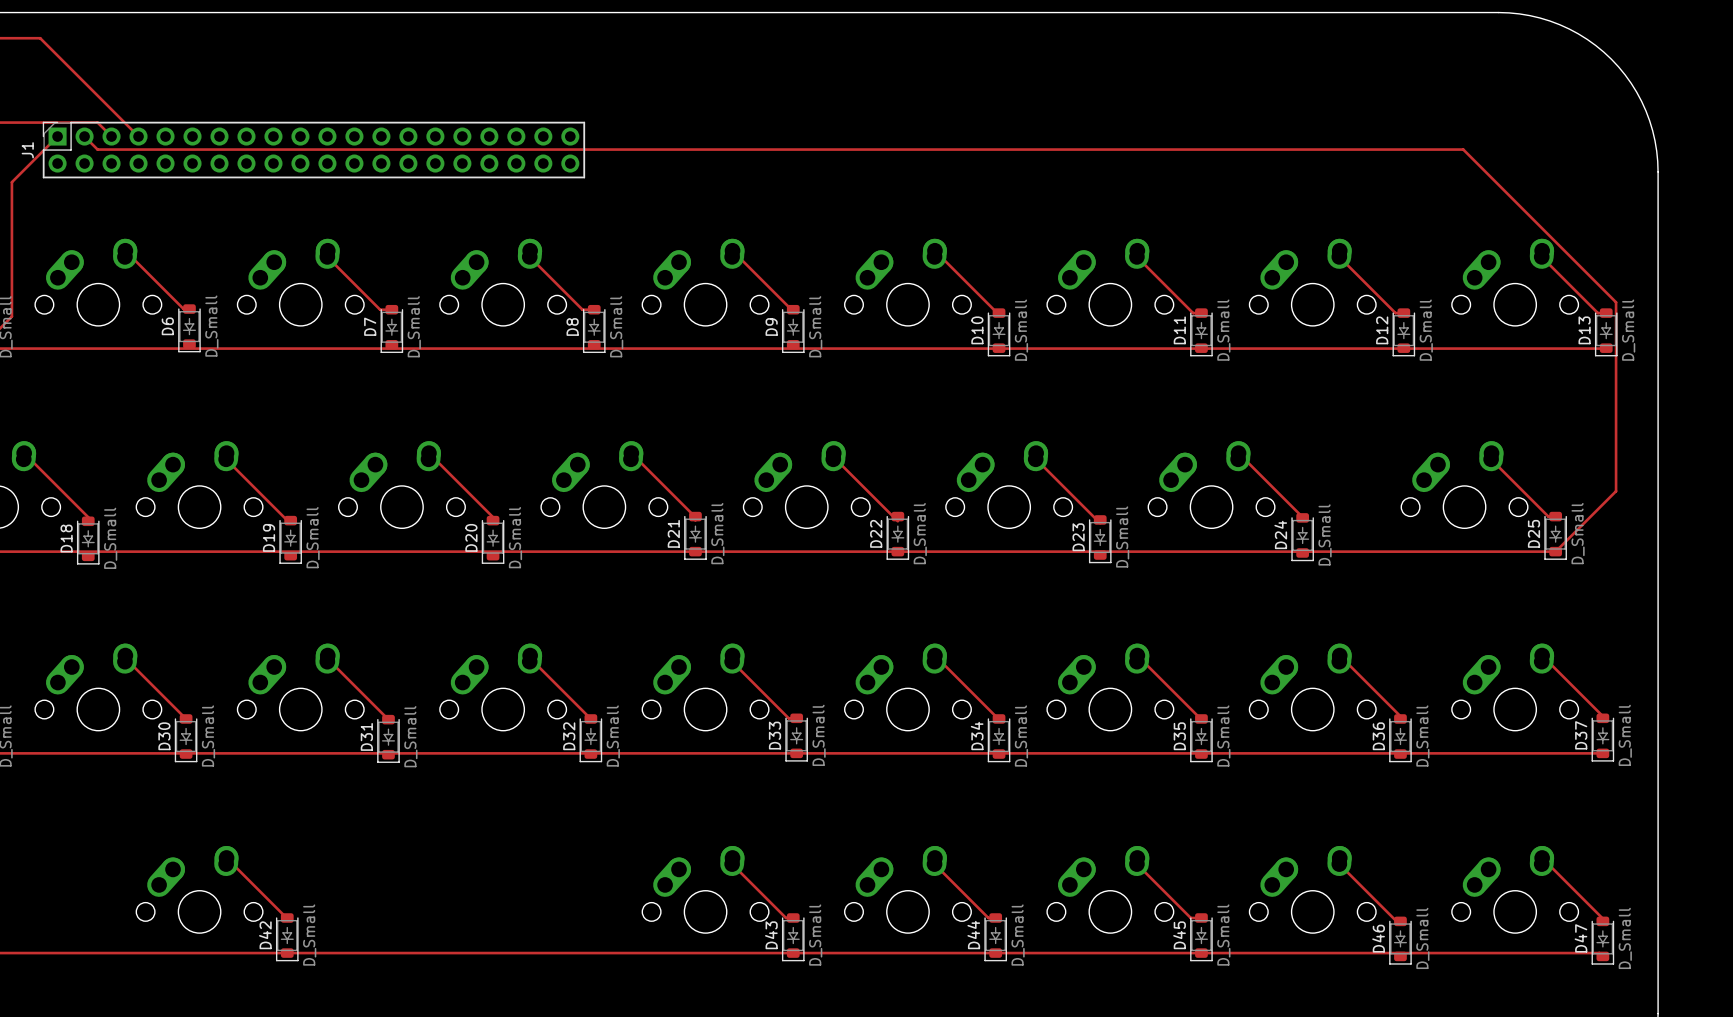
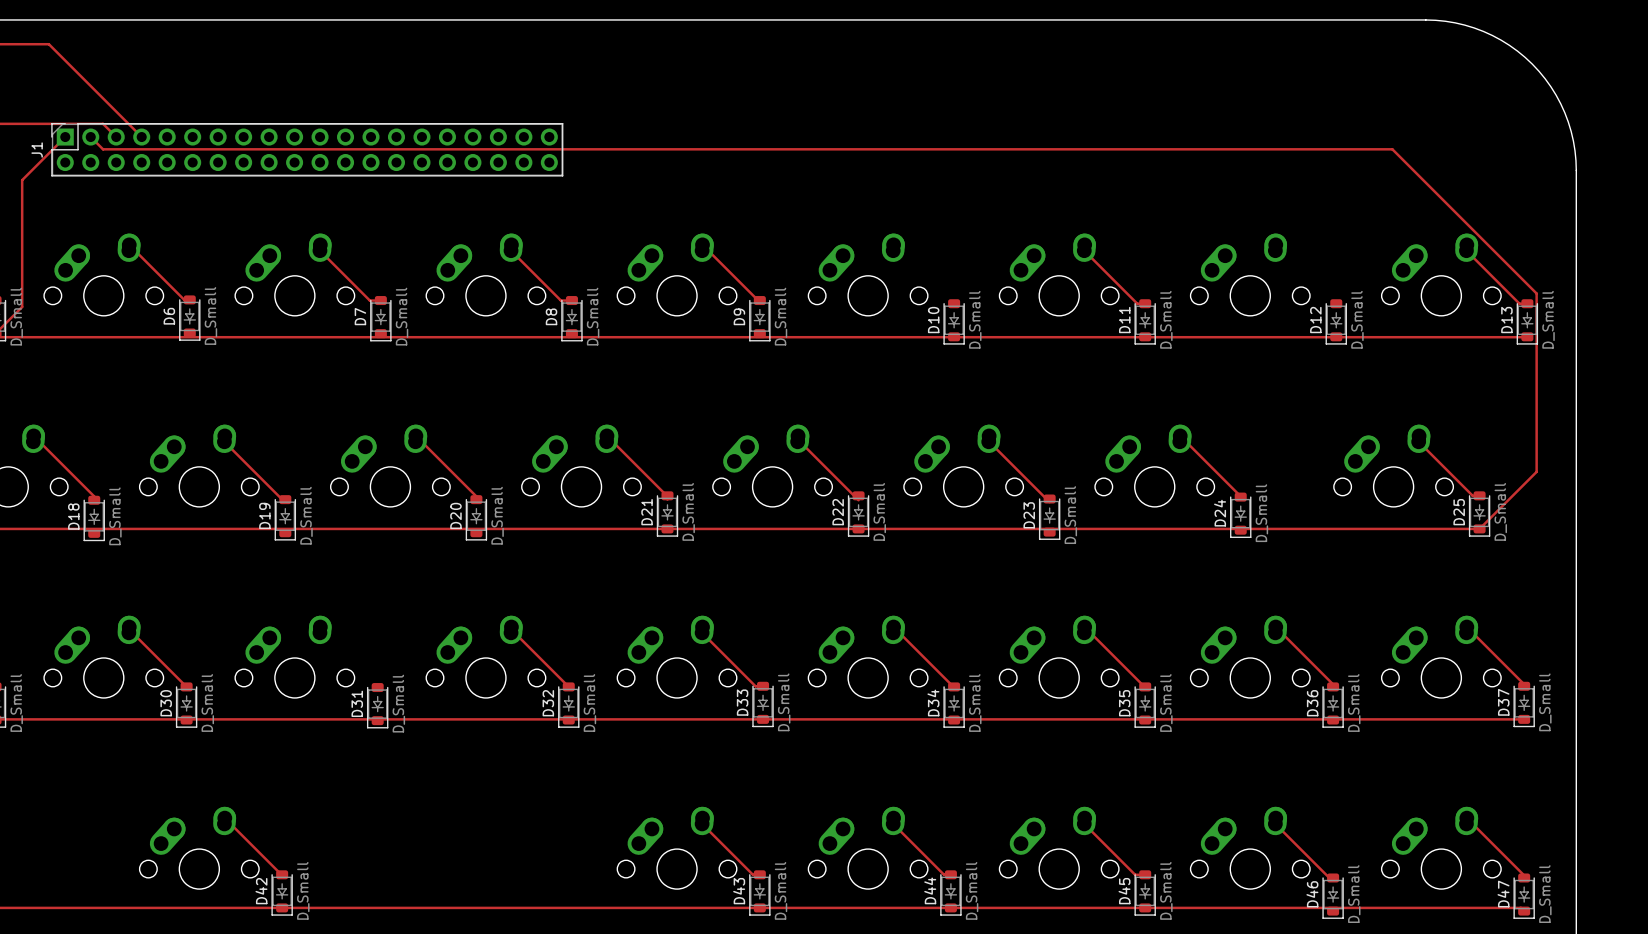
track: (934, 250) (999, 313) -> none
track: (1339, 256) (1395, 313) (1403, 313) -> none
track: (327, 661) (330, 661) (388, 719) (388, 716) -> none

